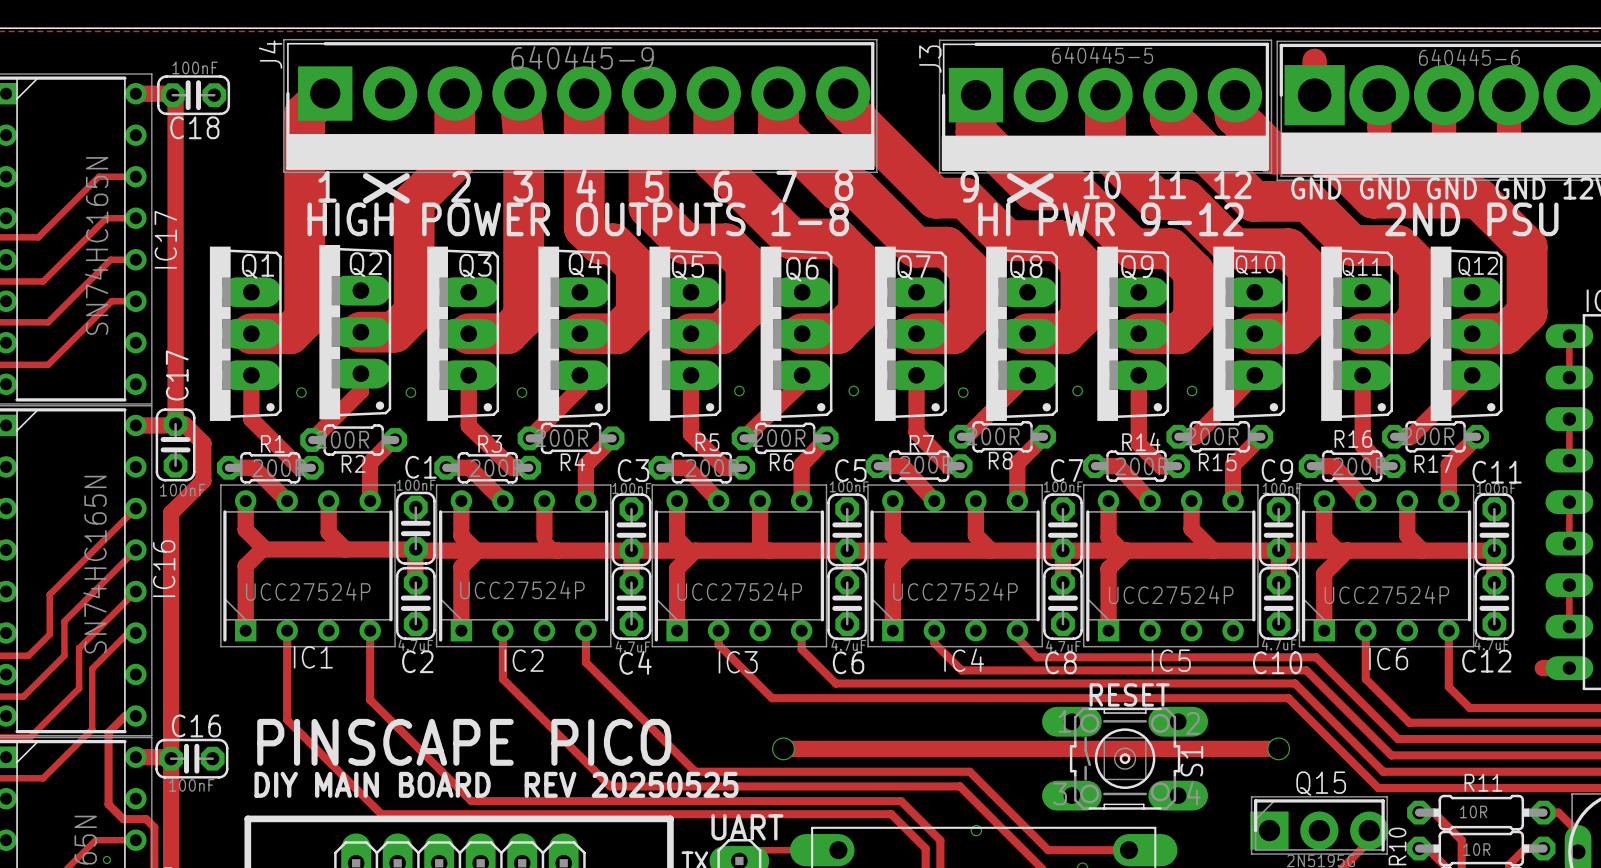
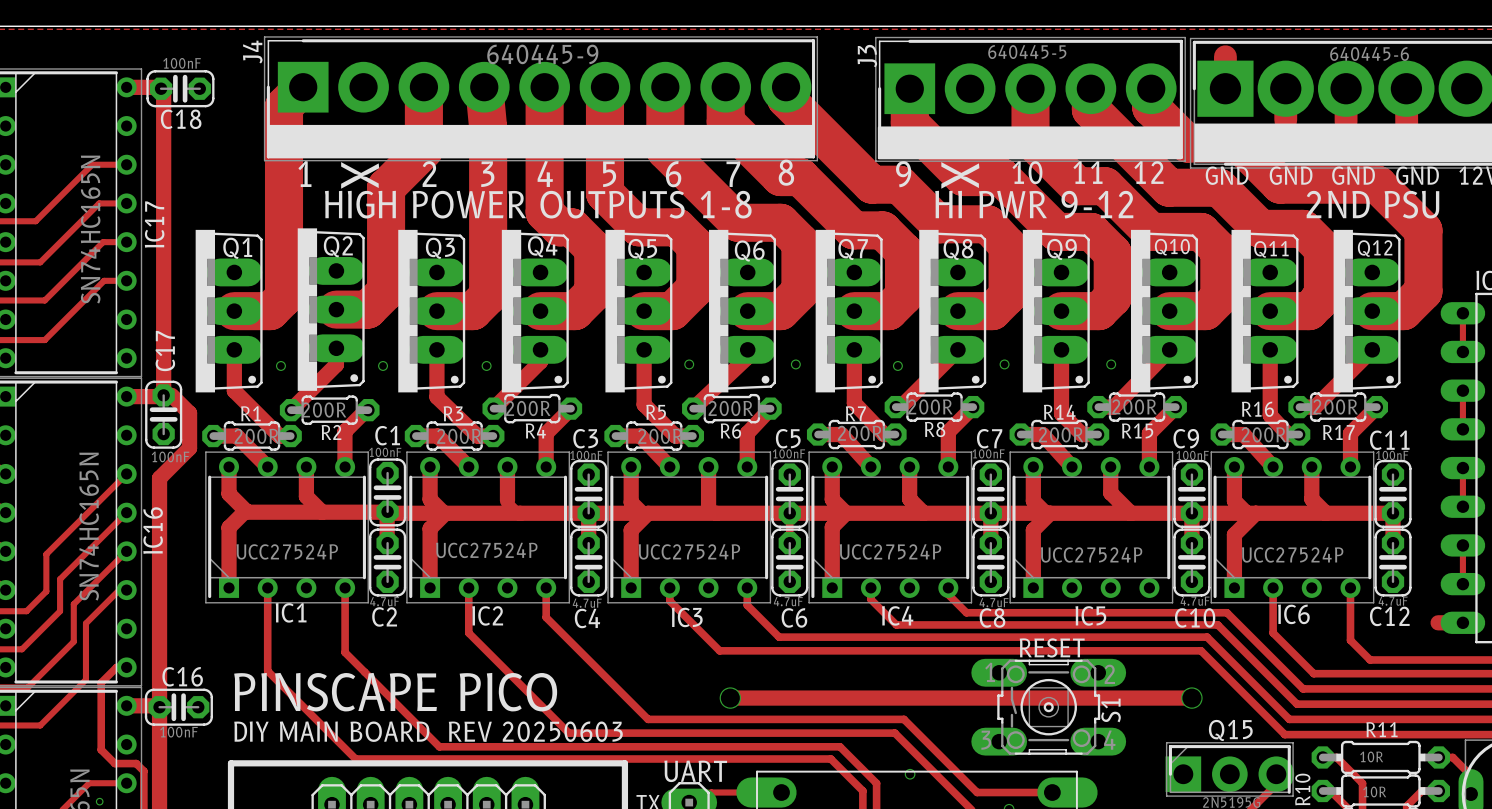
text: DIY MAIN BOARD REV 20250525 (496, 784) -> DIY MAIN BOARD REV 20250603 (428, 731)

